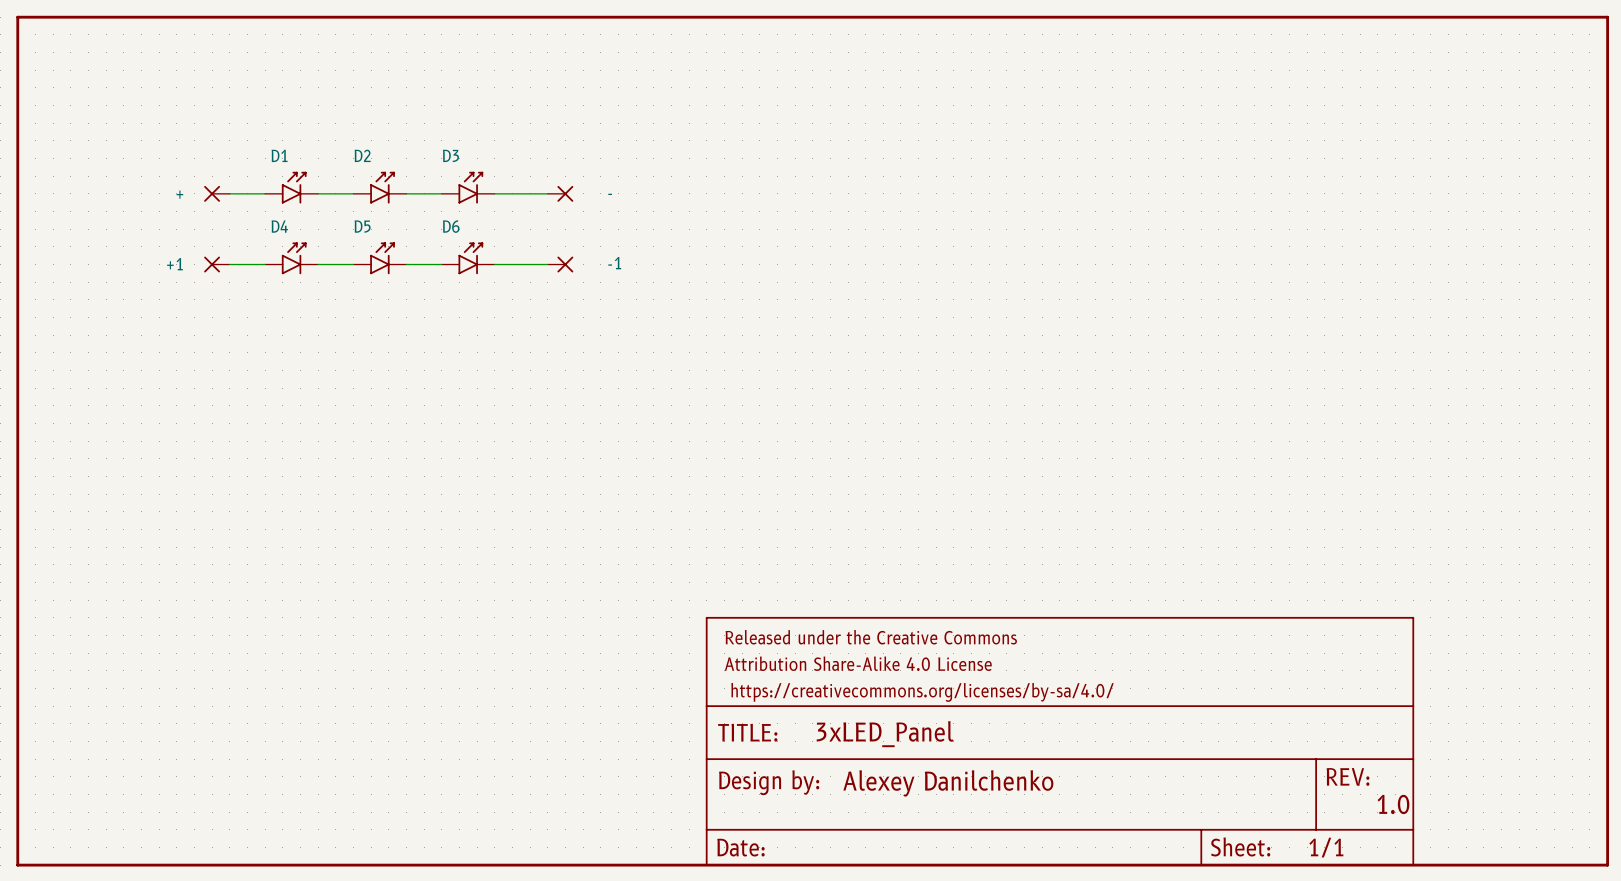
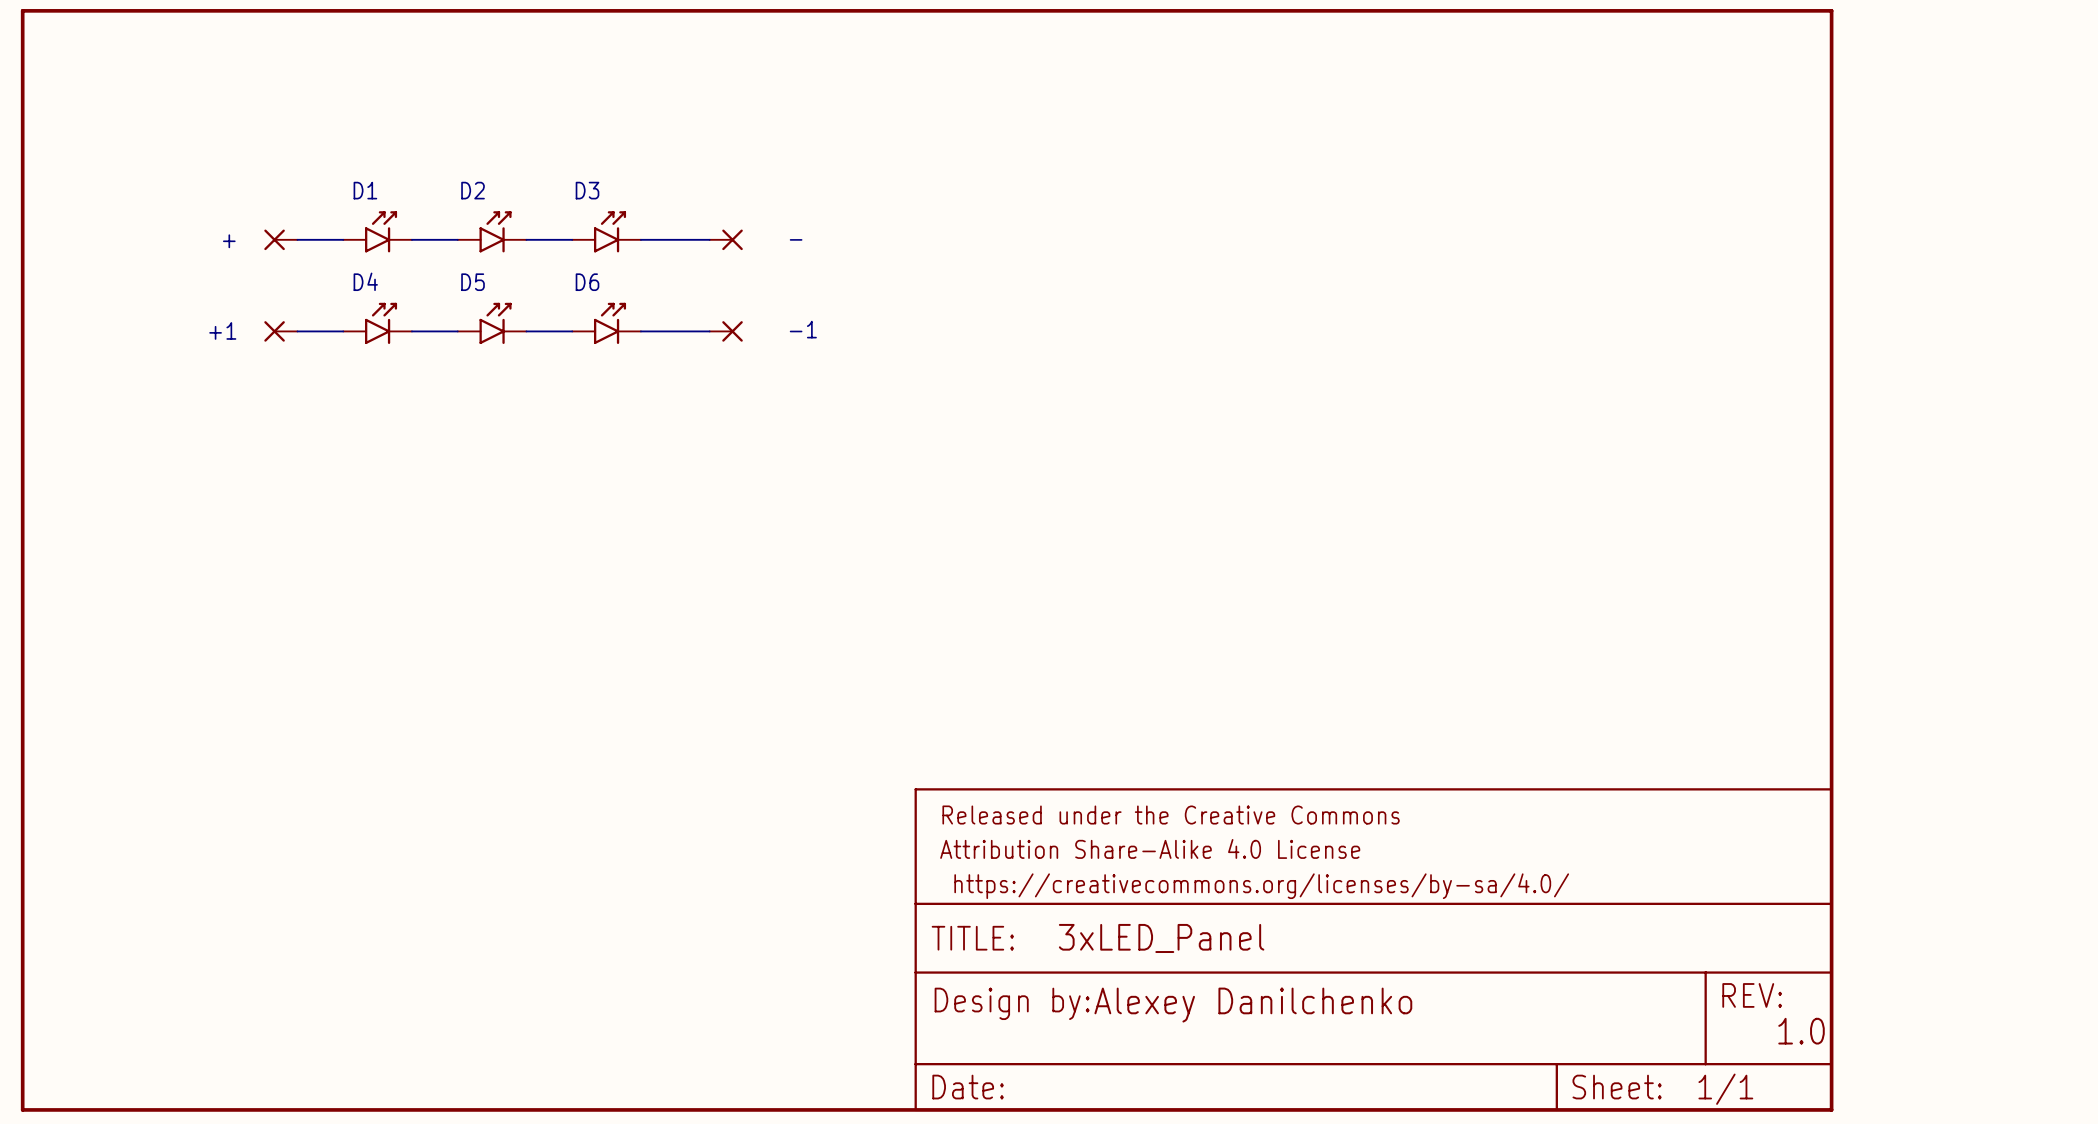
part: none -> (927, 560)
part: (812, 441) -> none

